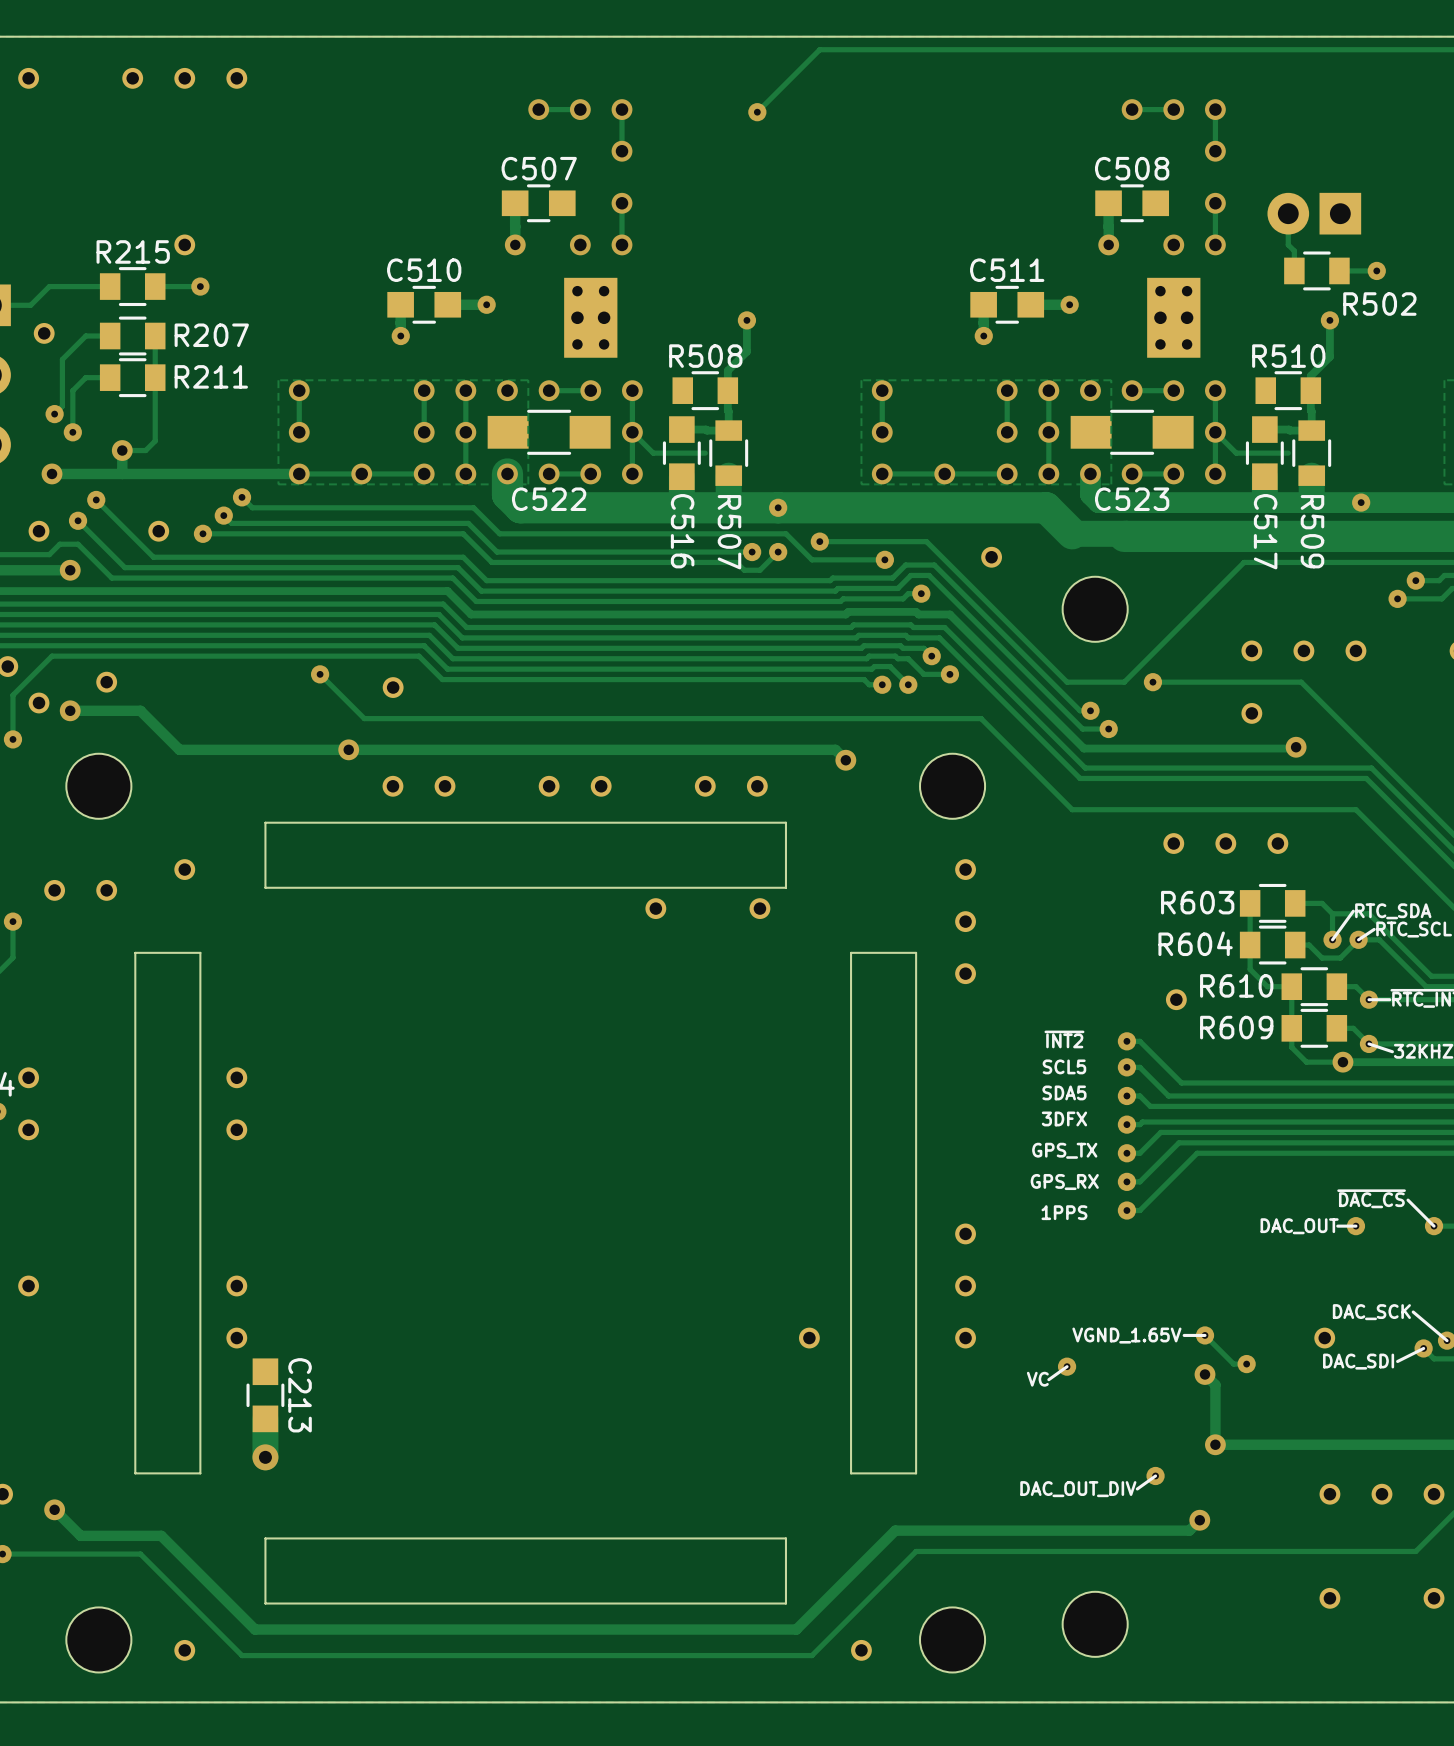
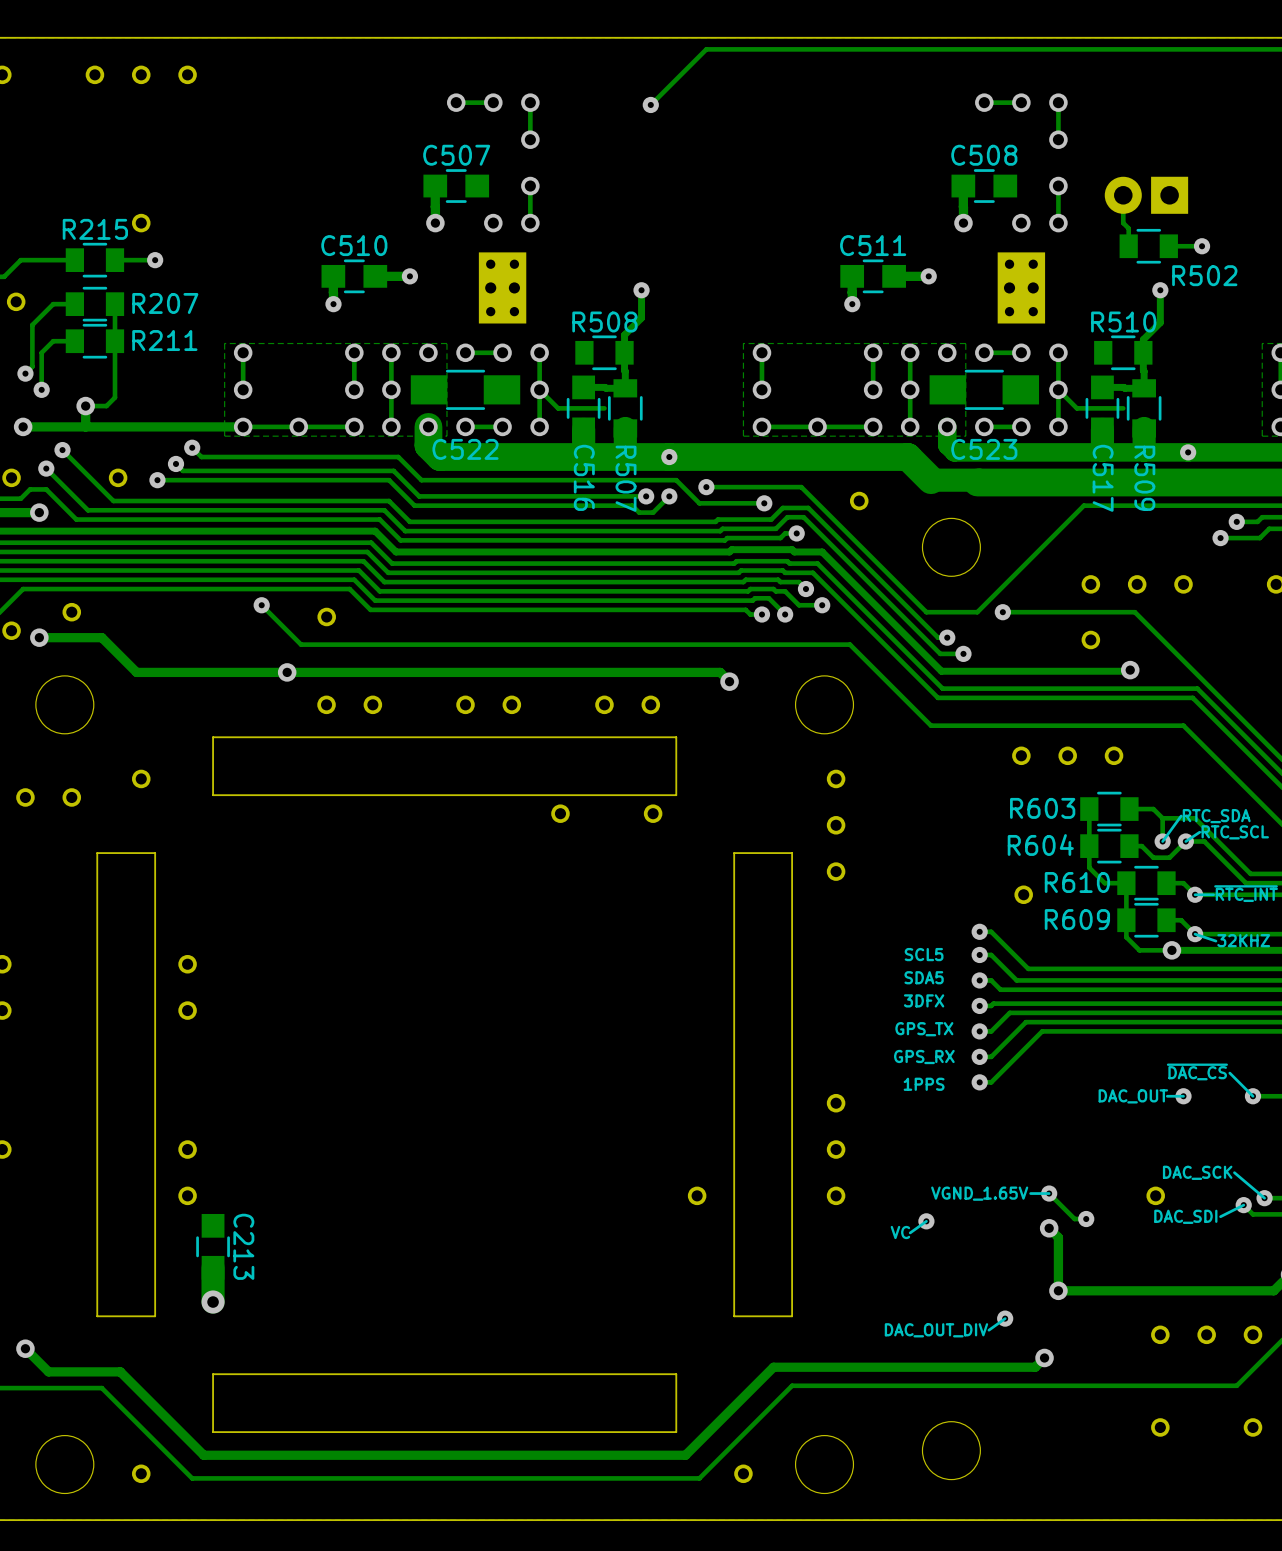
text: ~{INT2} (1064, 1039) -> none

